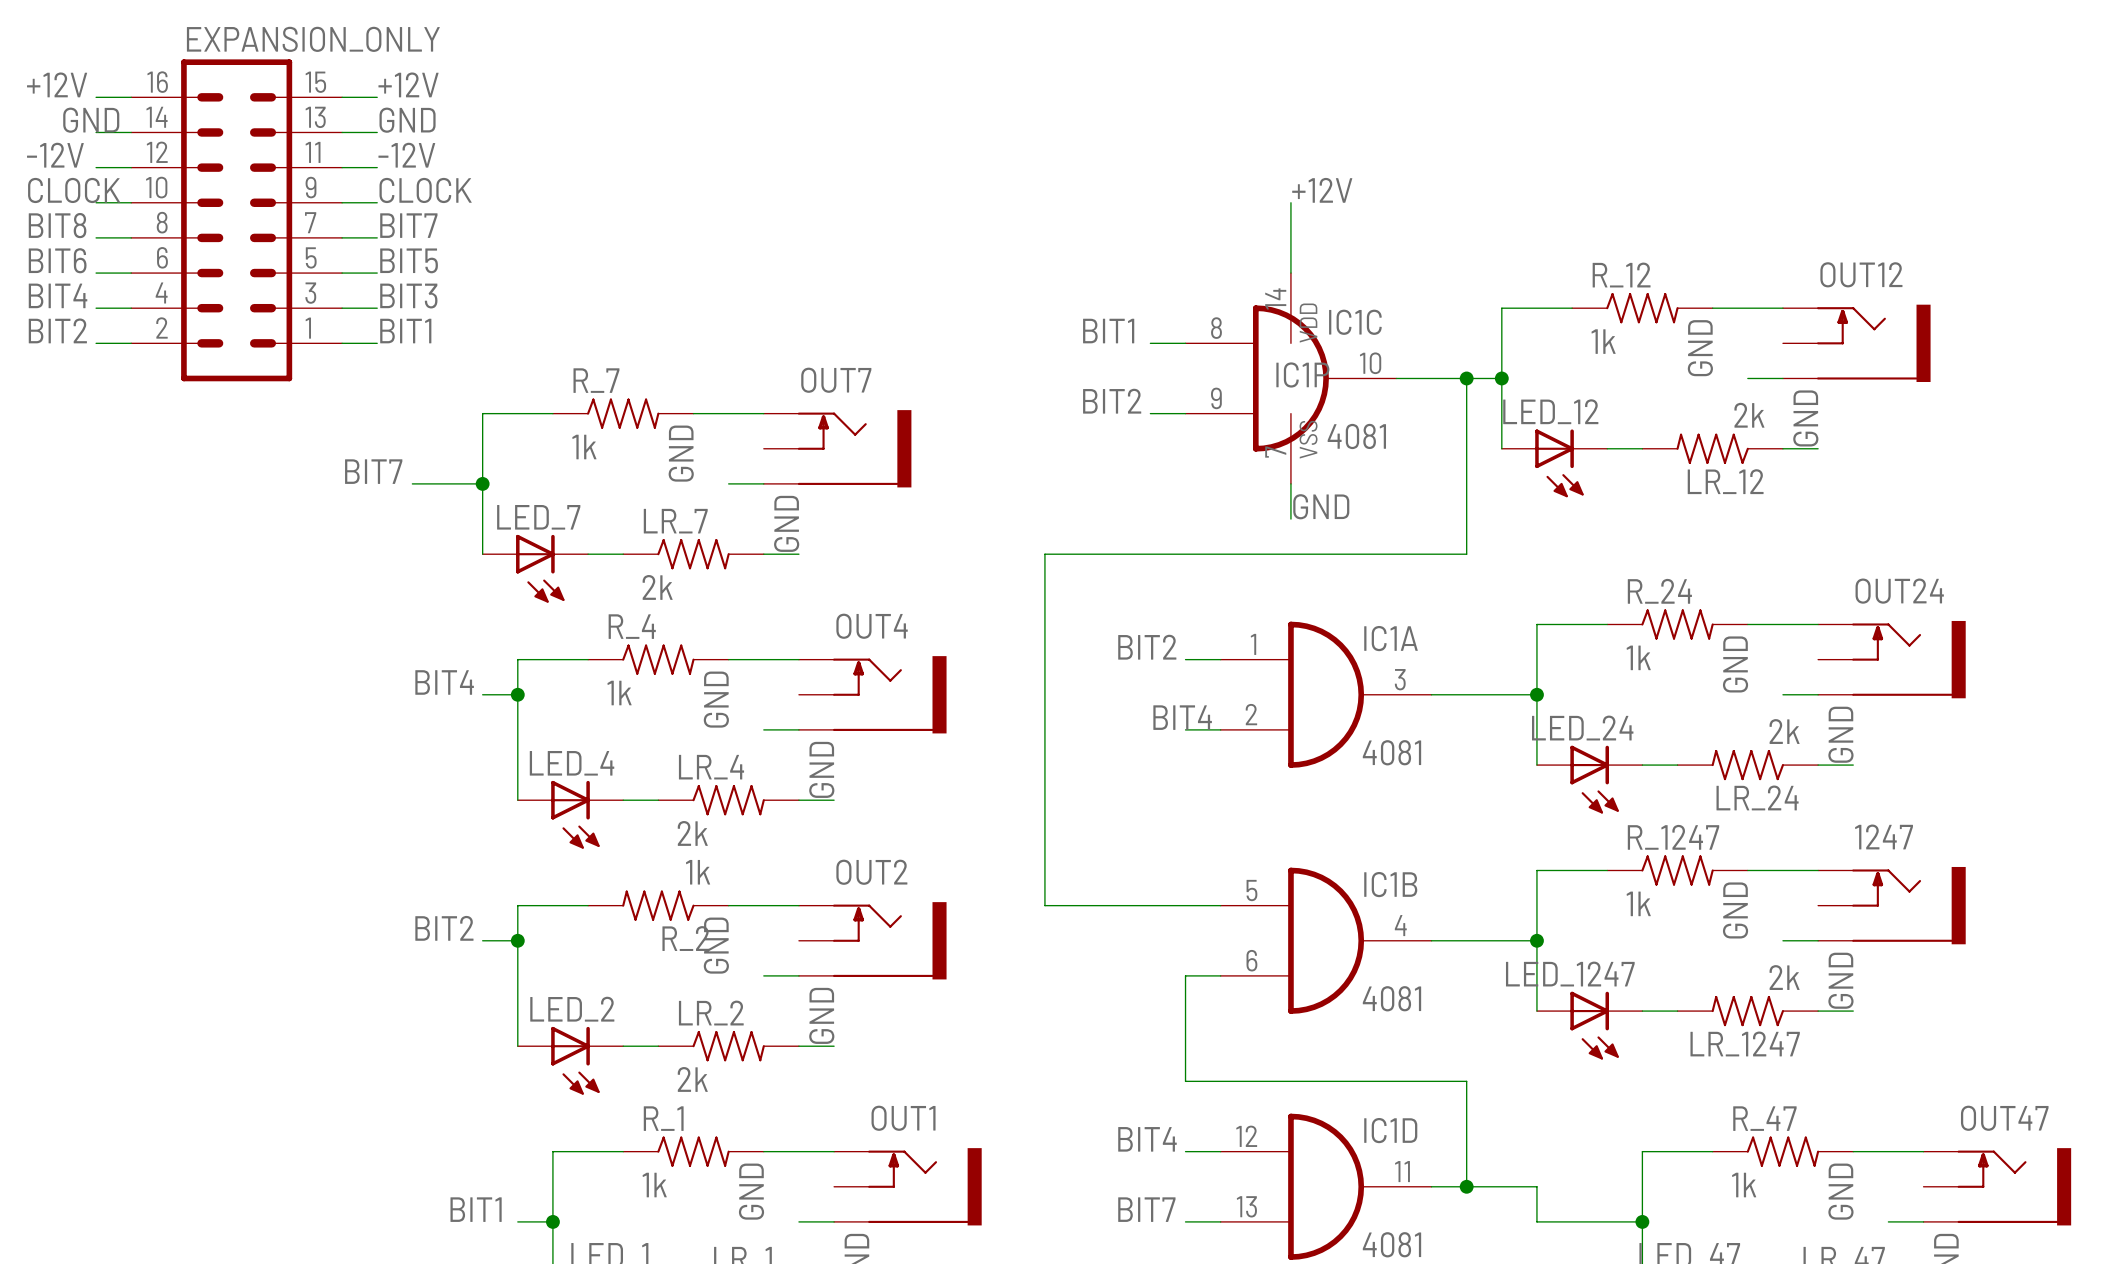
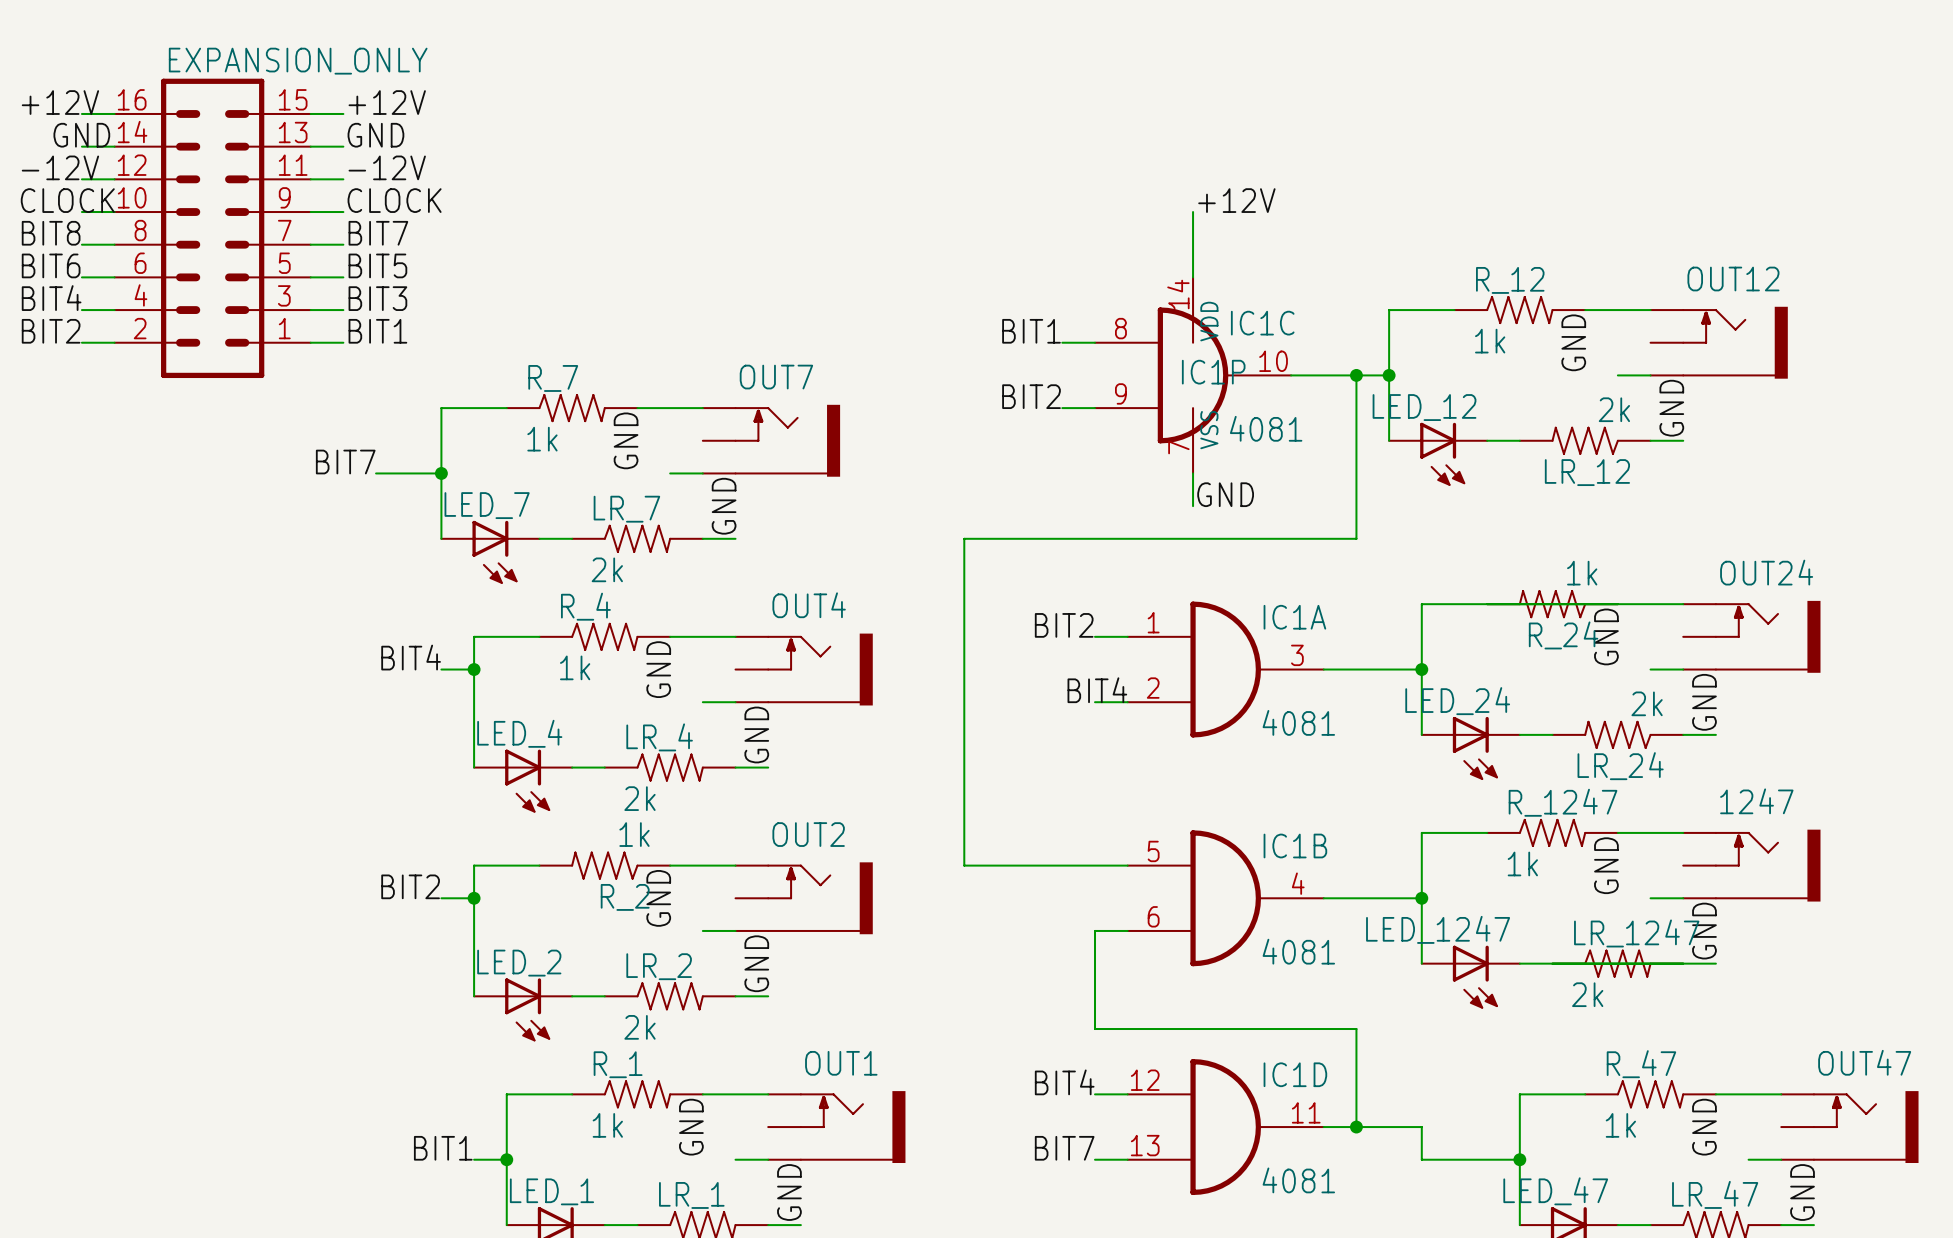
R_24 rotation: 0° (1677, 624) -> 180° (1552, 604)
LR_1247 rotation: 0° (1747, 1011) -> 180° (1617, 963)

